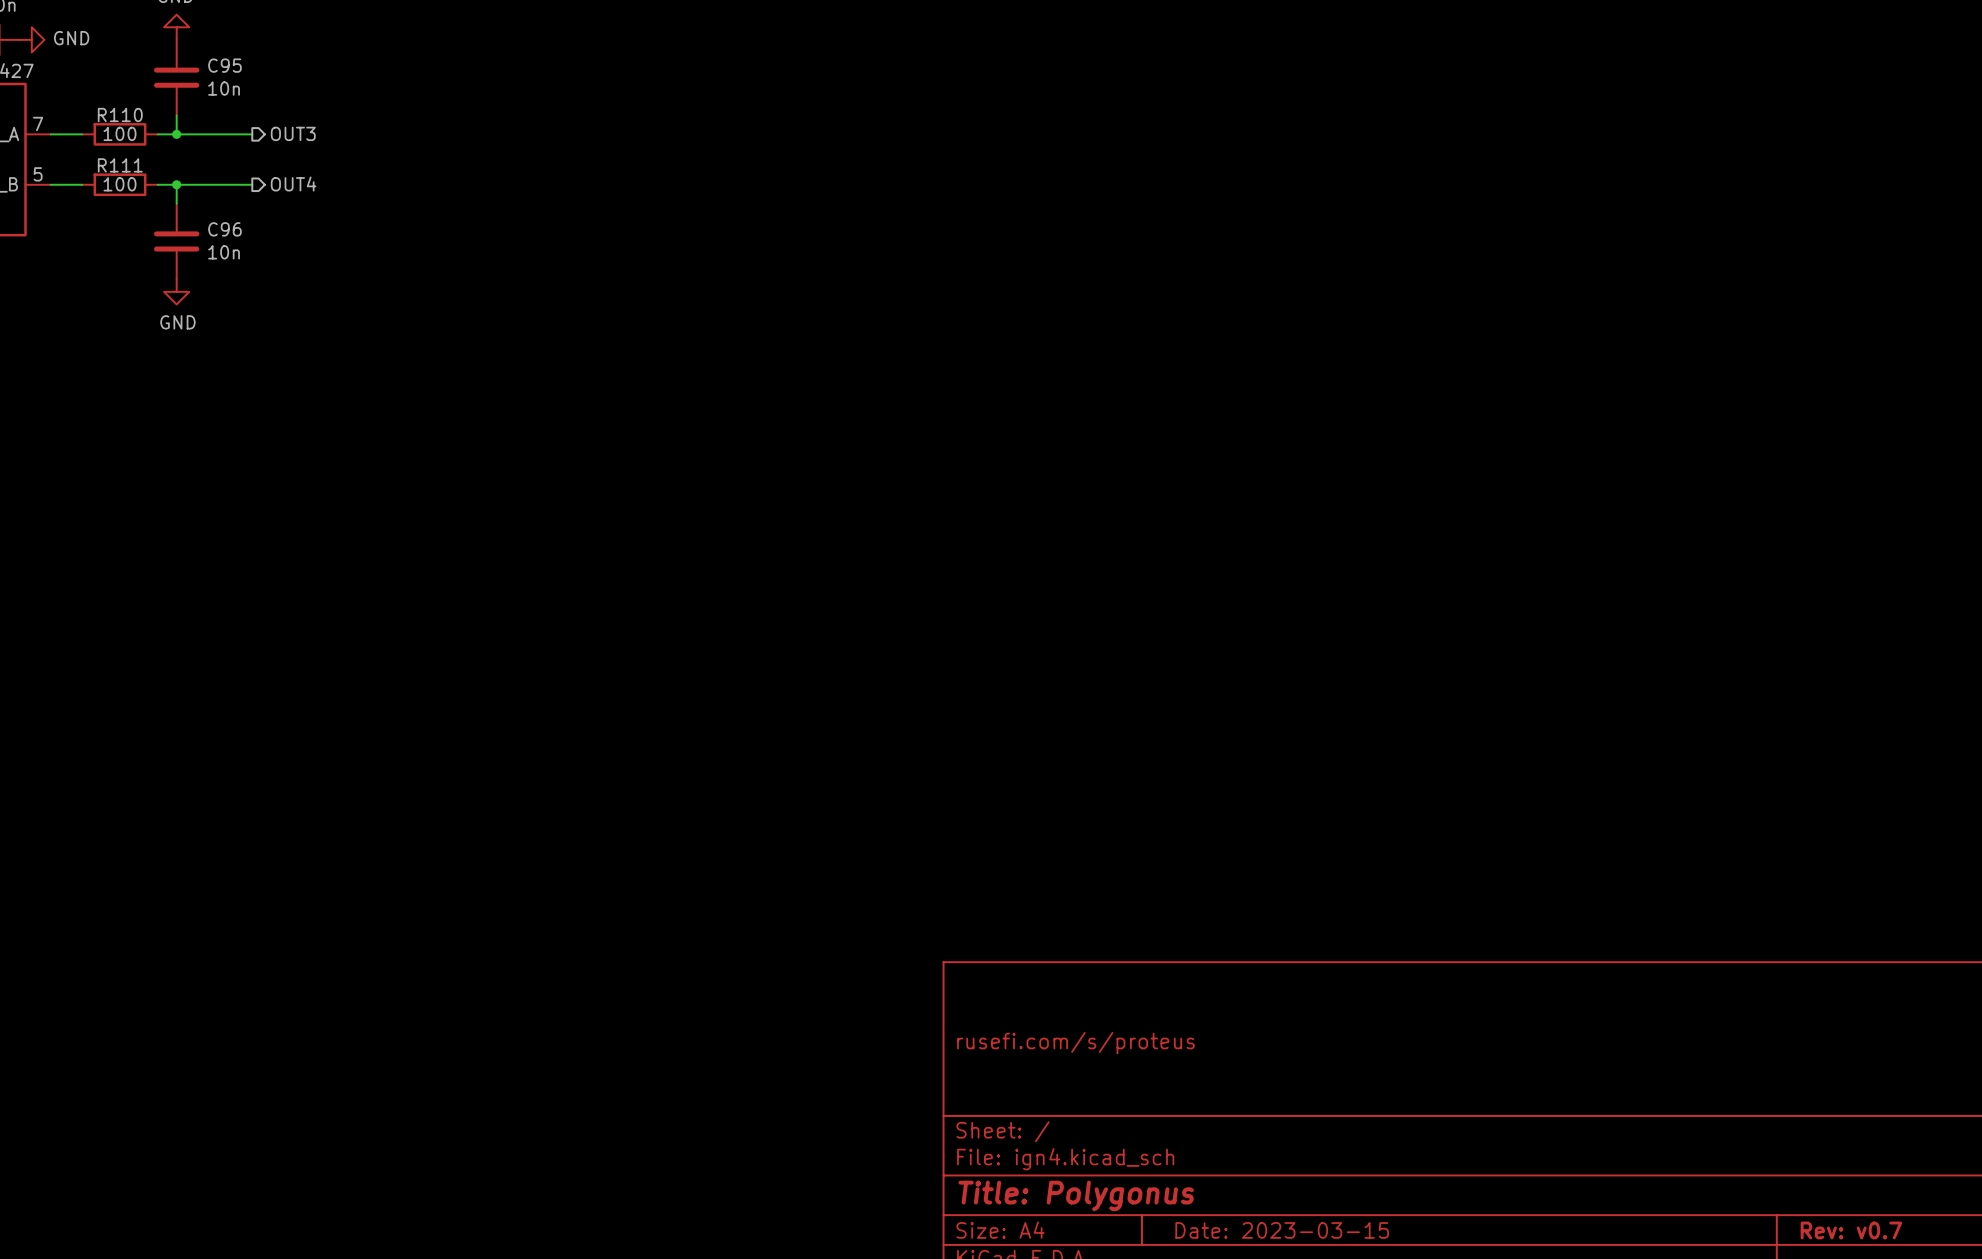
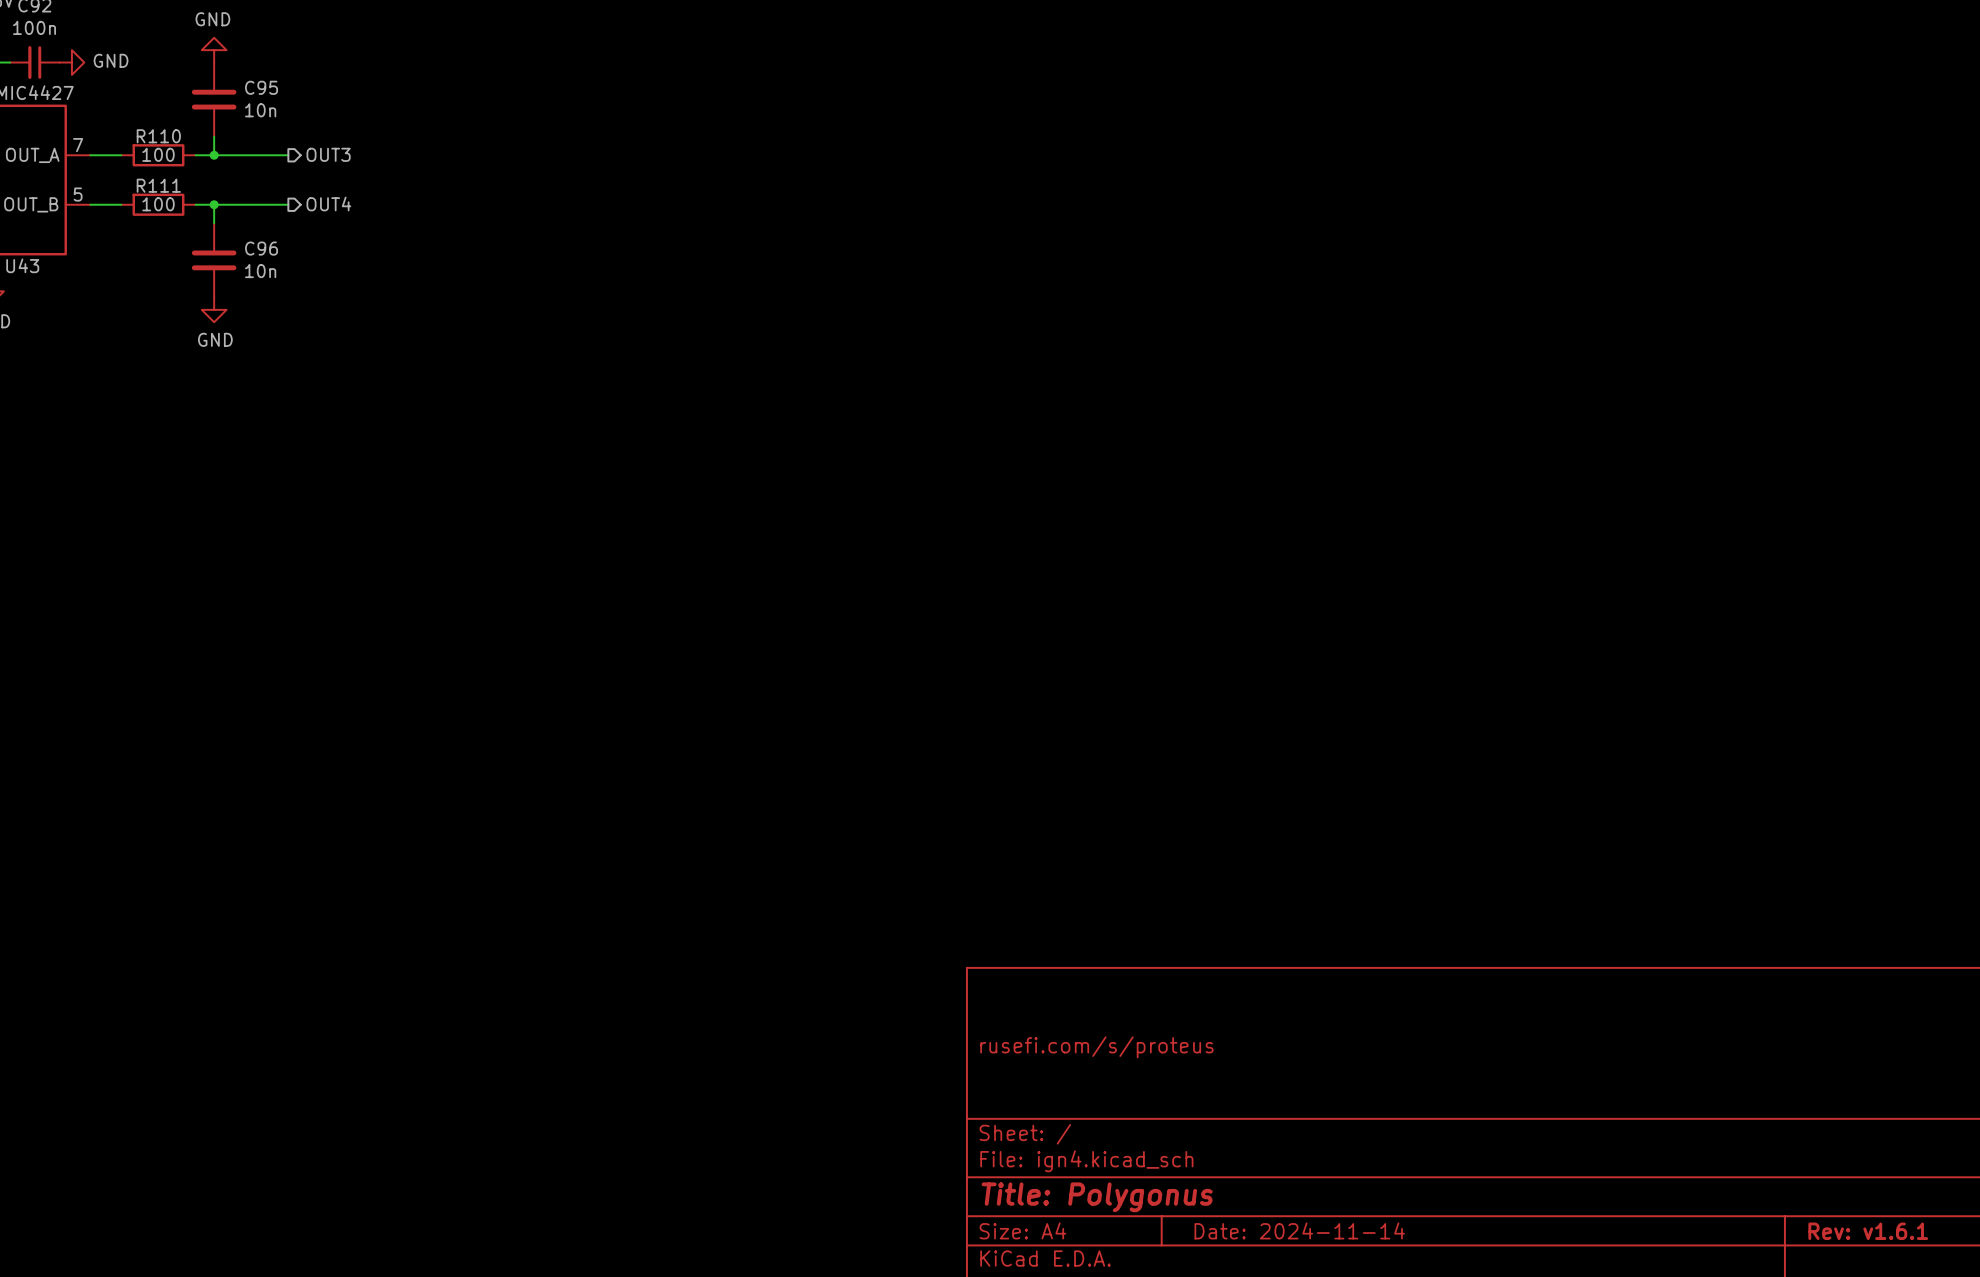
title block: Date: 2023-03-15 (1282, 1230) -> Date: 2024-11-14 (1299, 1230)
title block: Rev: v0.7 (1851, 1230) -> Rev: v1.6.1 (1868, 1231)

